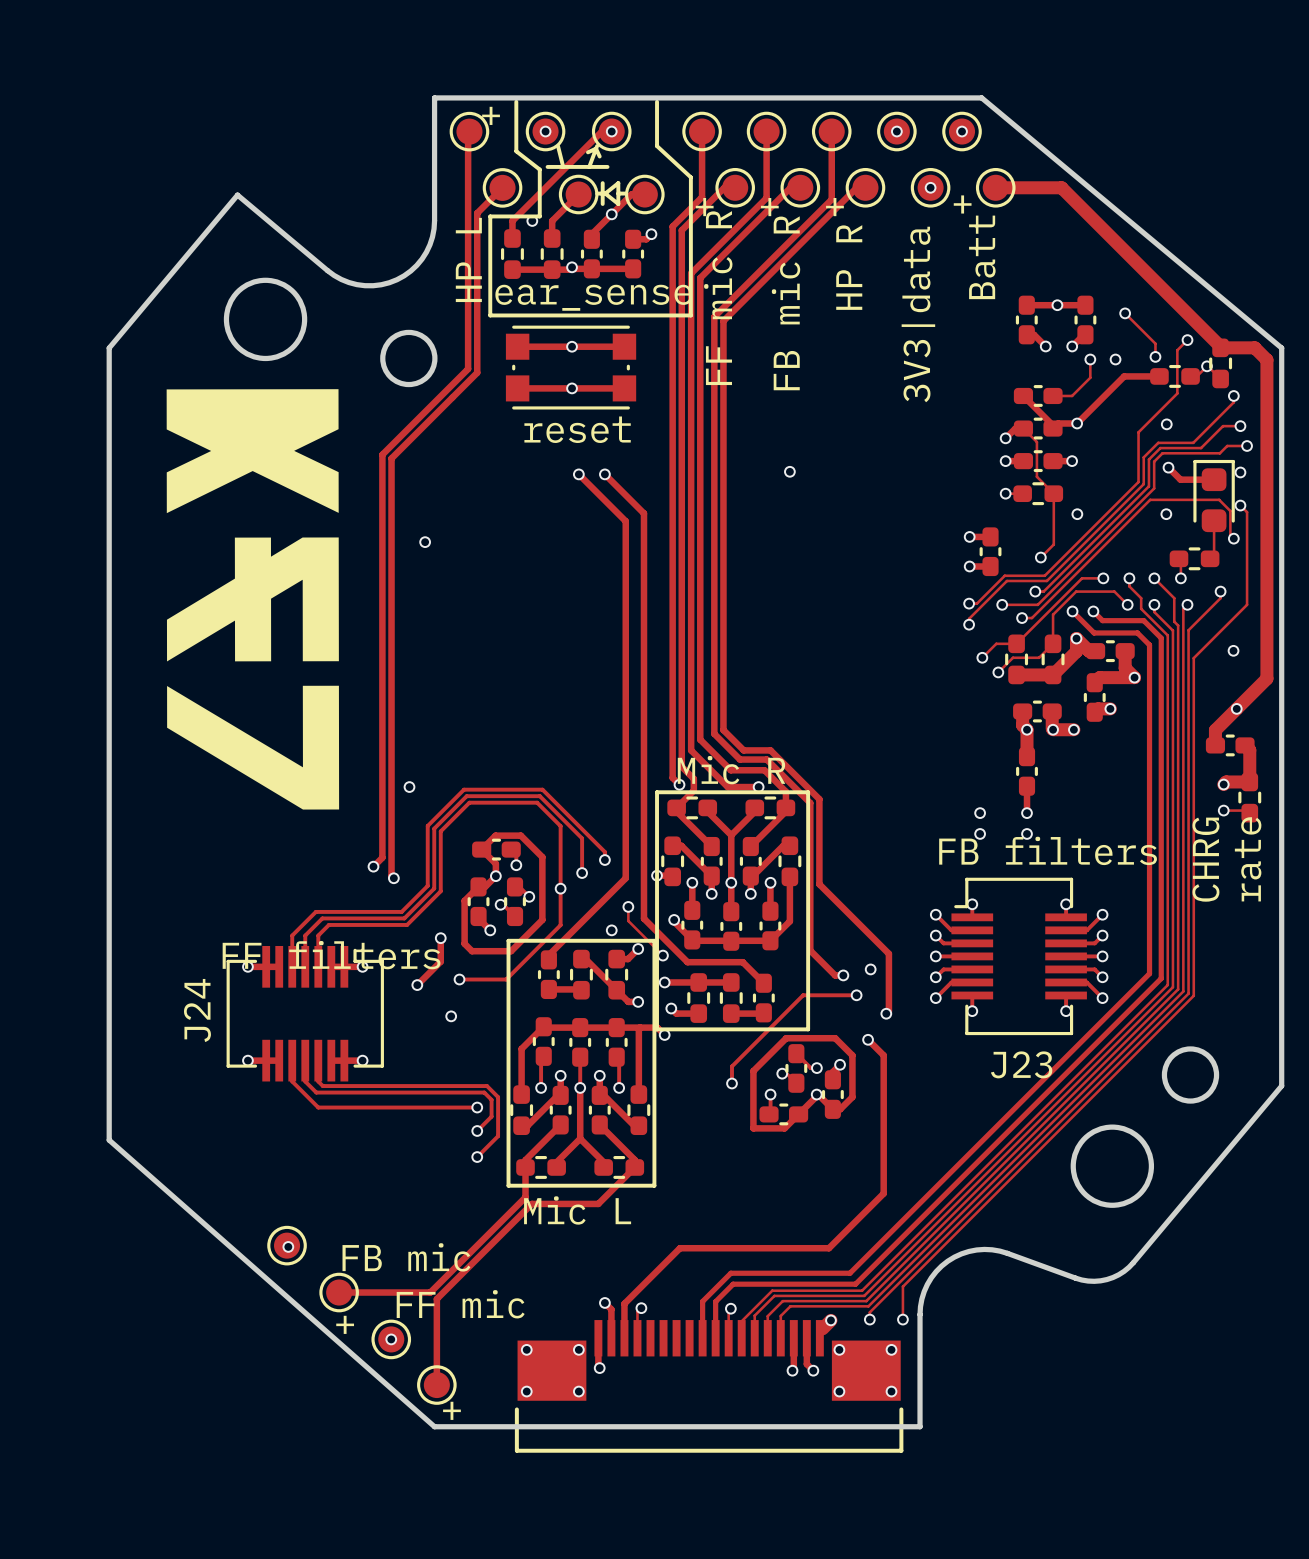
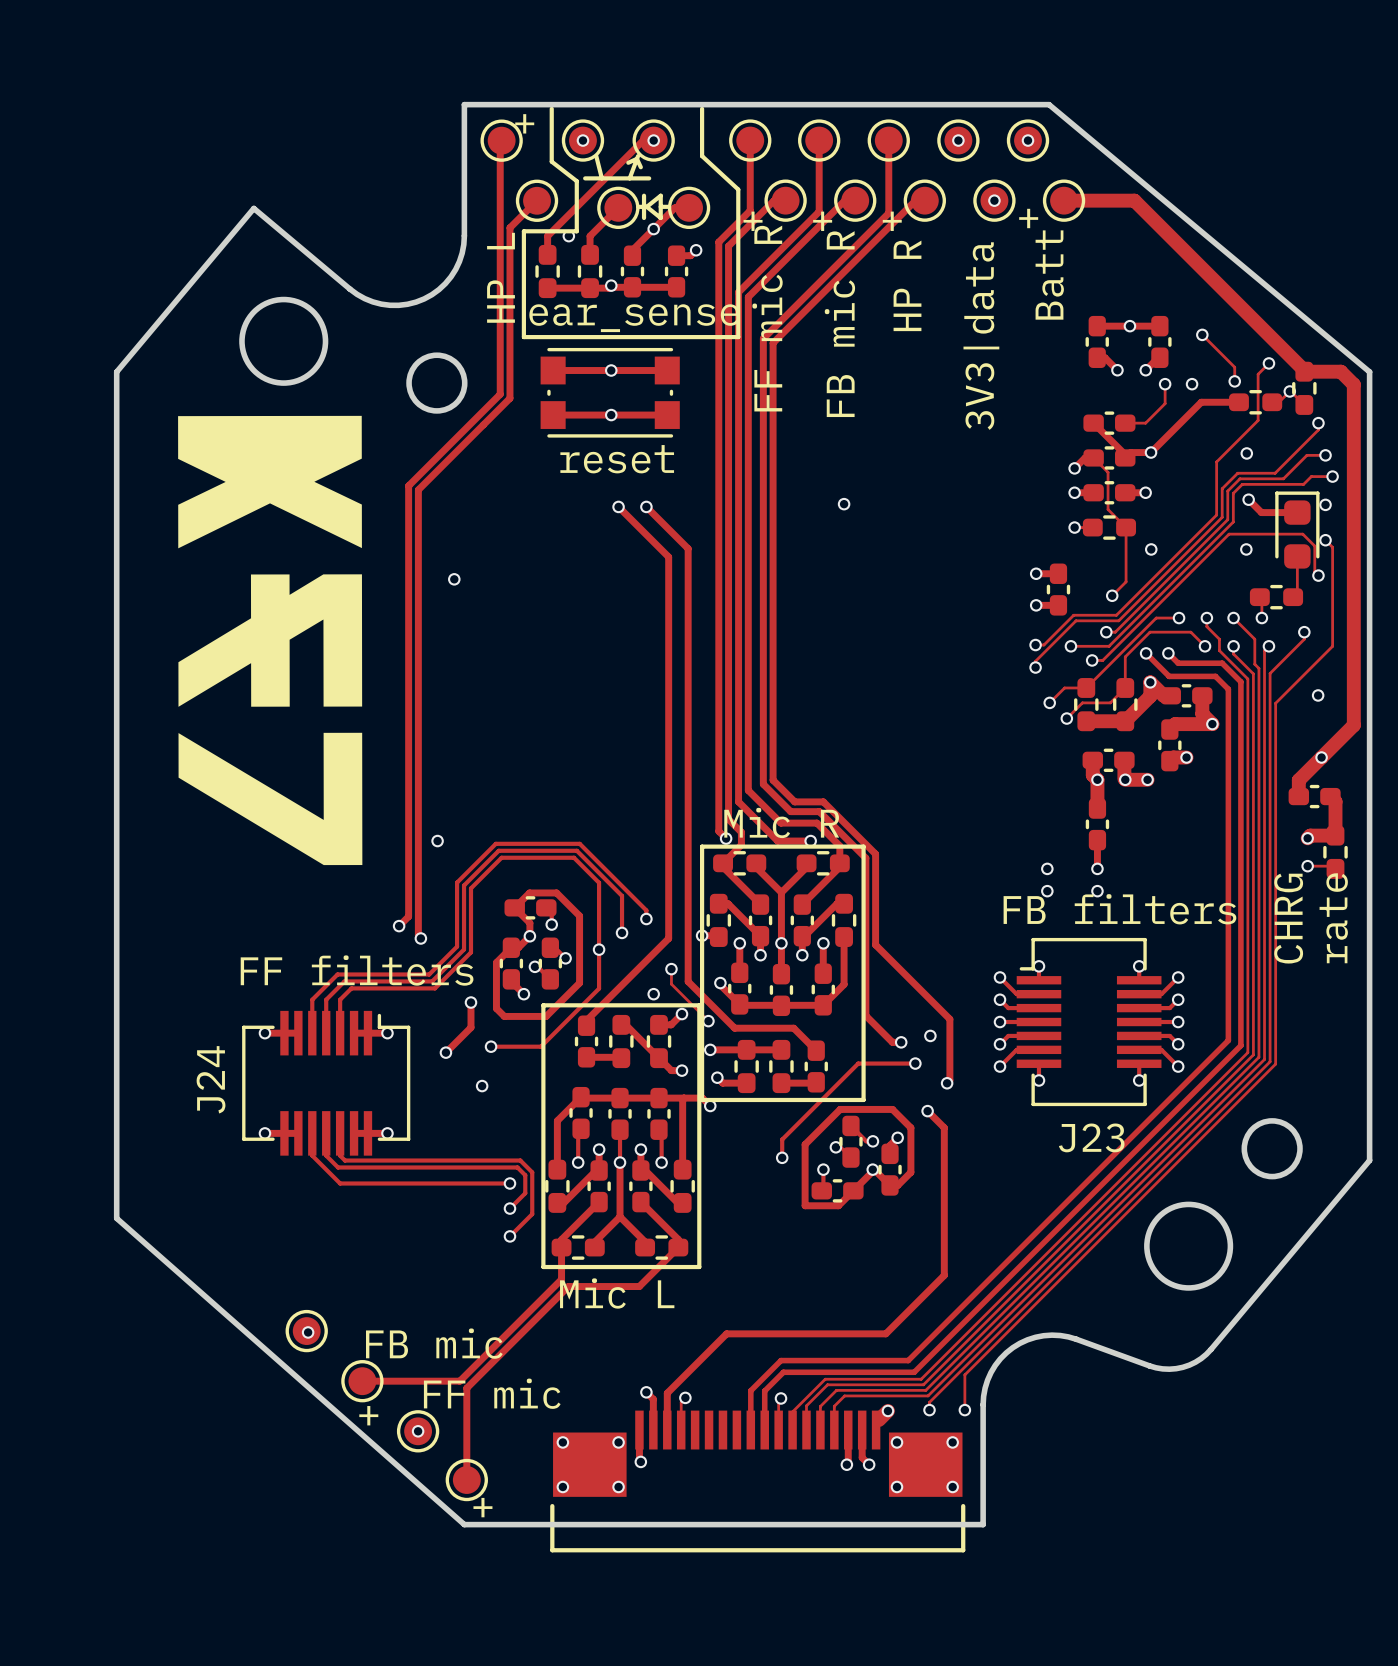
text position: FF filters (331, 955) -> FF filters (357, 970)

